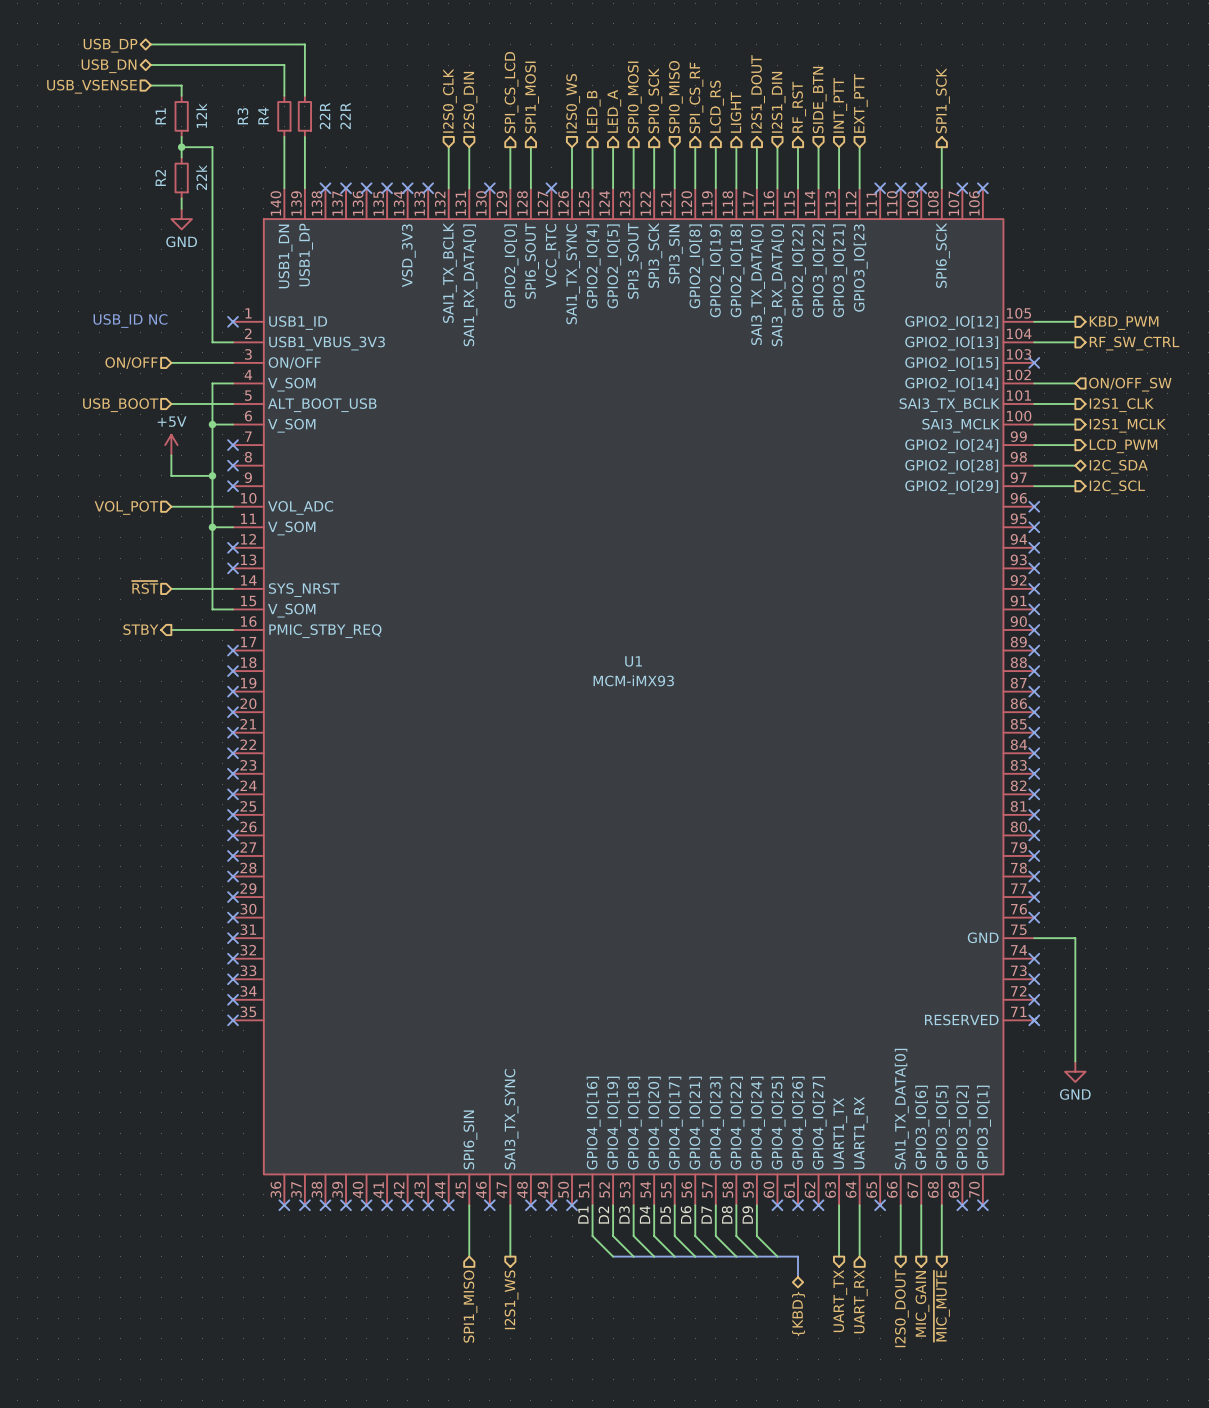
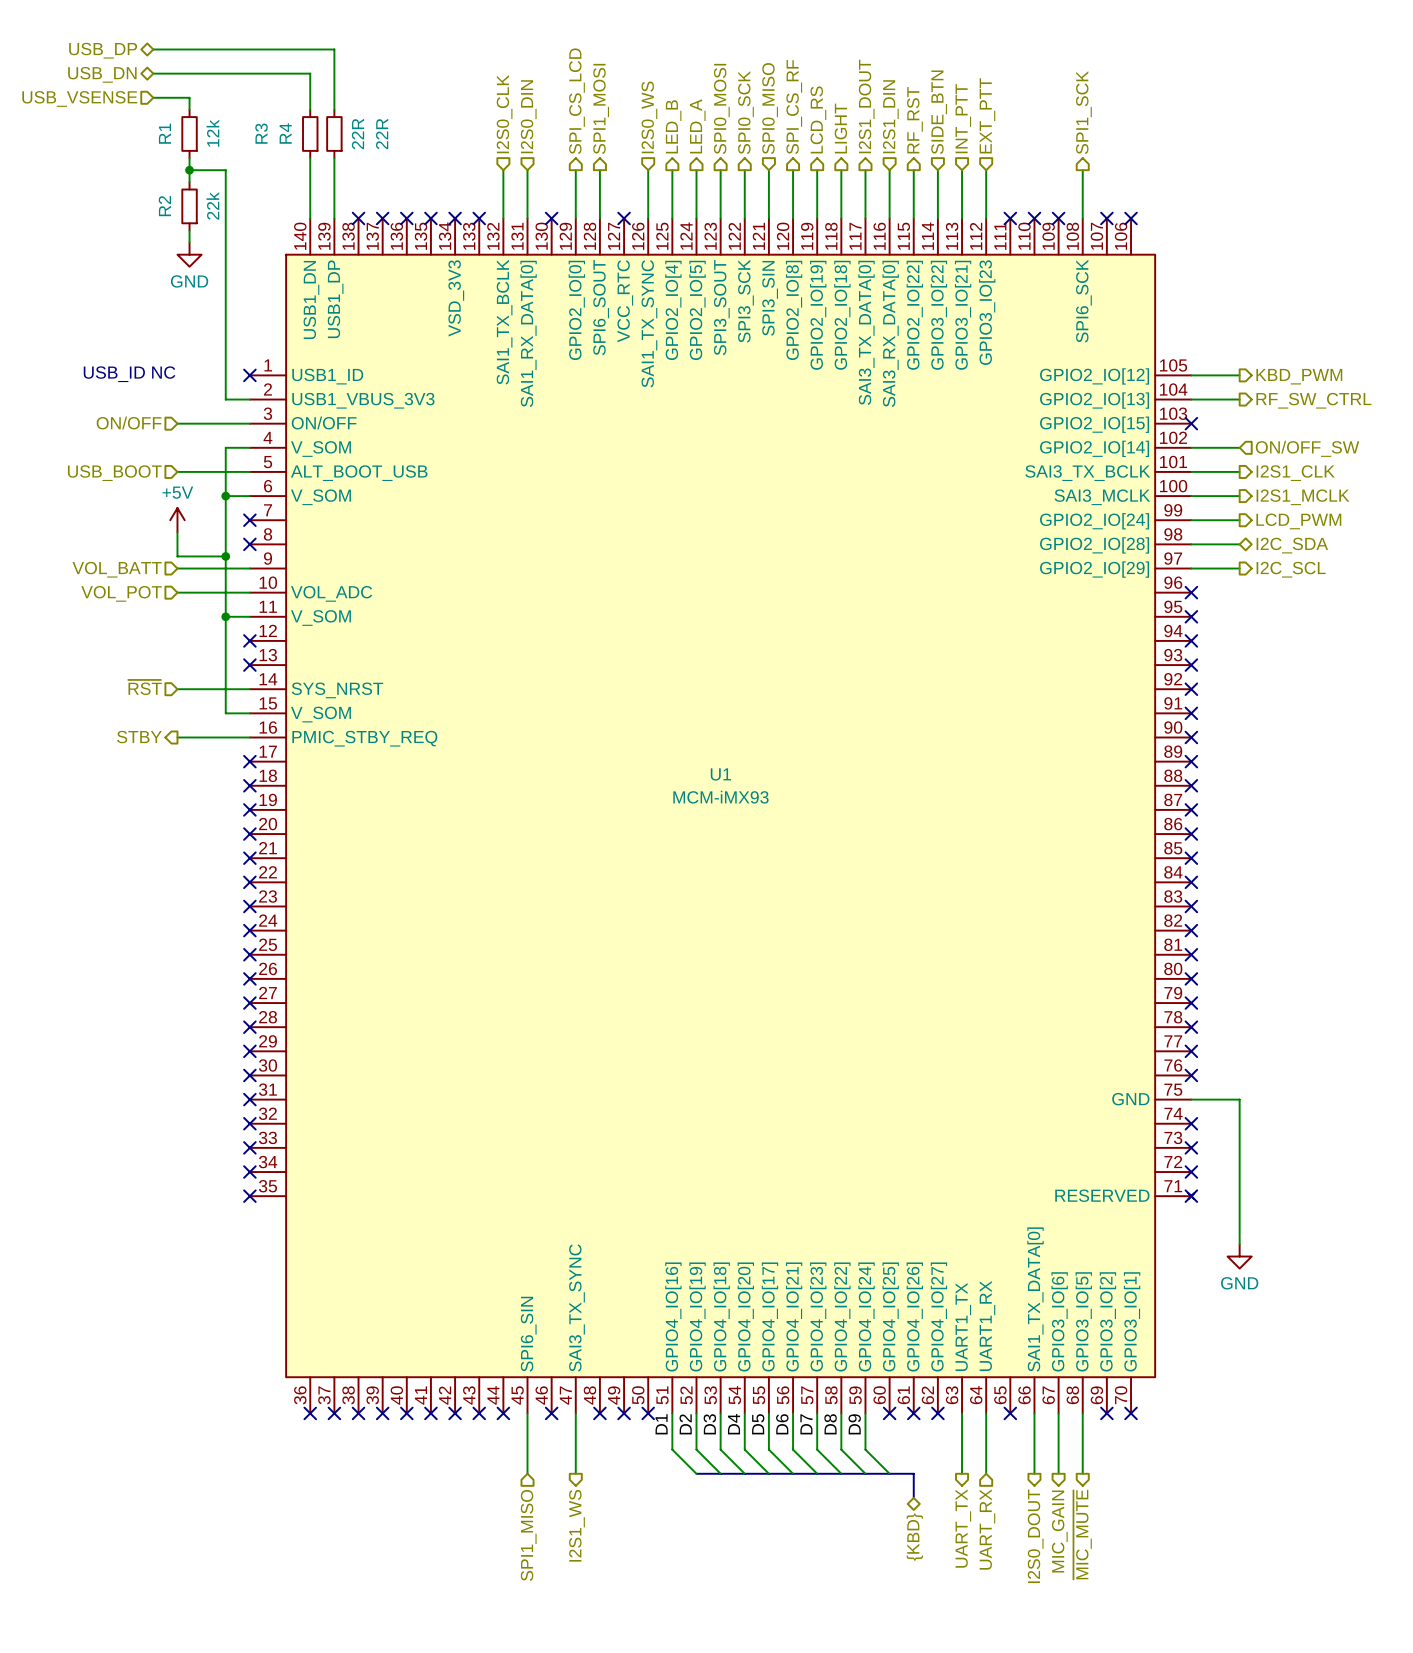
wire: none -> (177, 568) (249, 568)
no-connect mark: (233, 486) -> none
hierarchical label: none -> VOL_BATT (117, 569)

